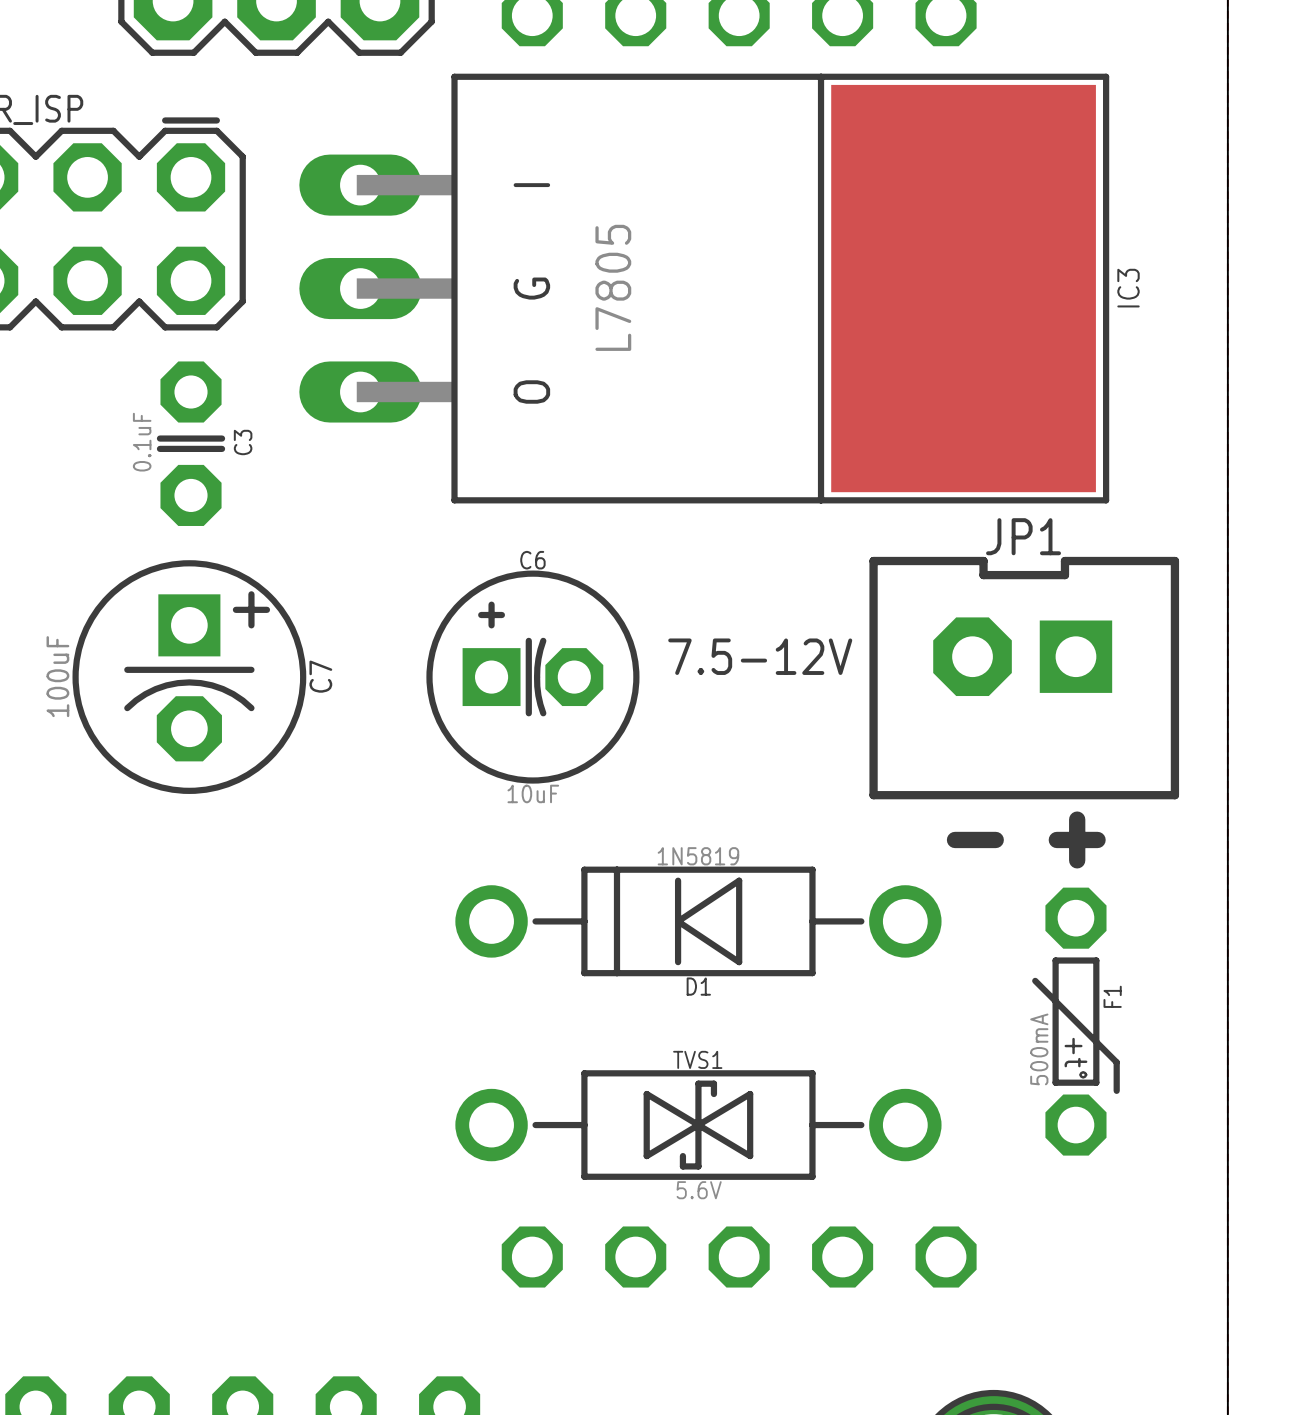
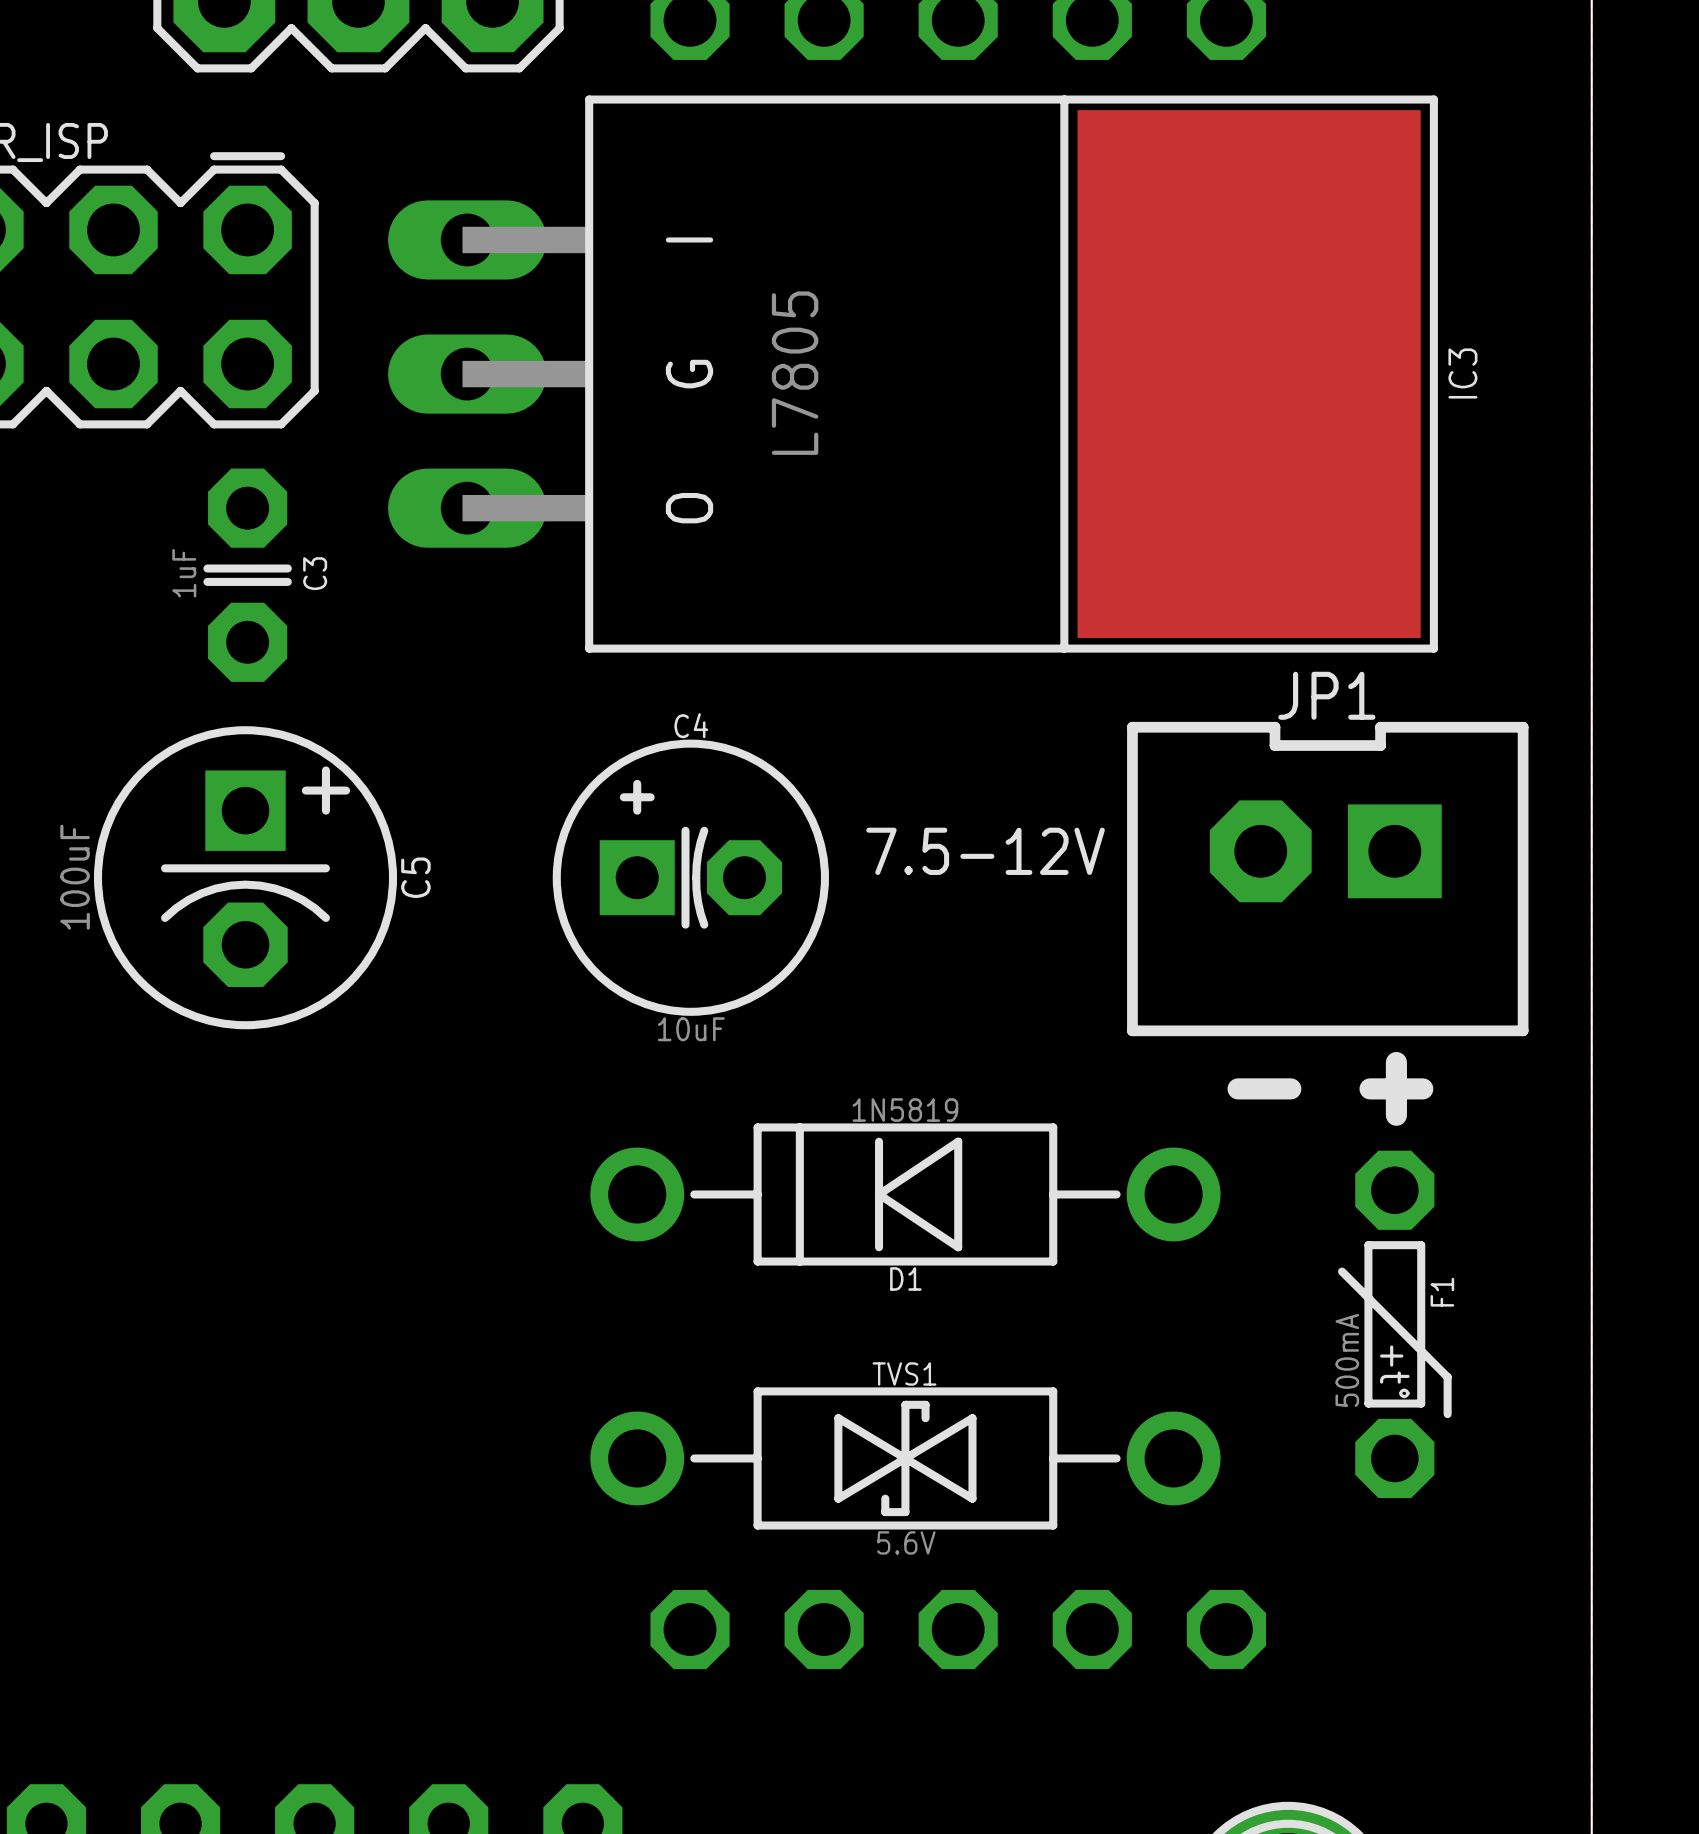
C3 value: 0.1uF (142, 442) -> 1uF (184, 573)
C6 name: C6 (532, 560) -> C4 (691, 725)
C7 name: C7 (320, 676) -> C5 (415, 877)

